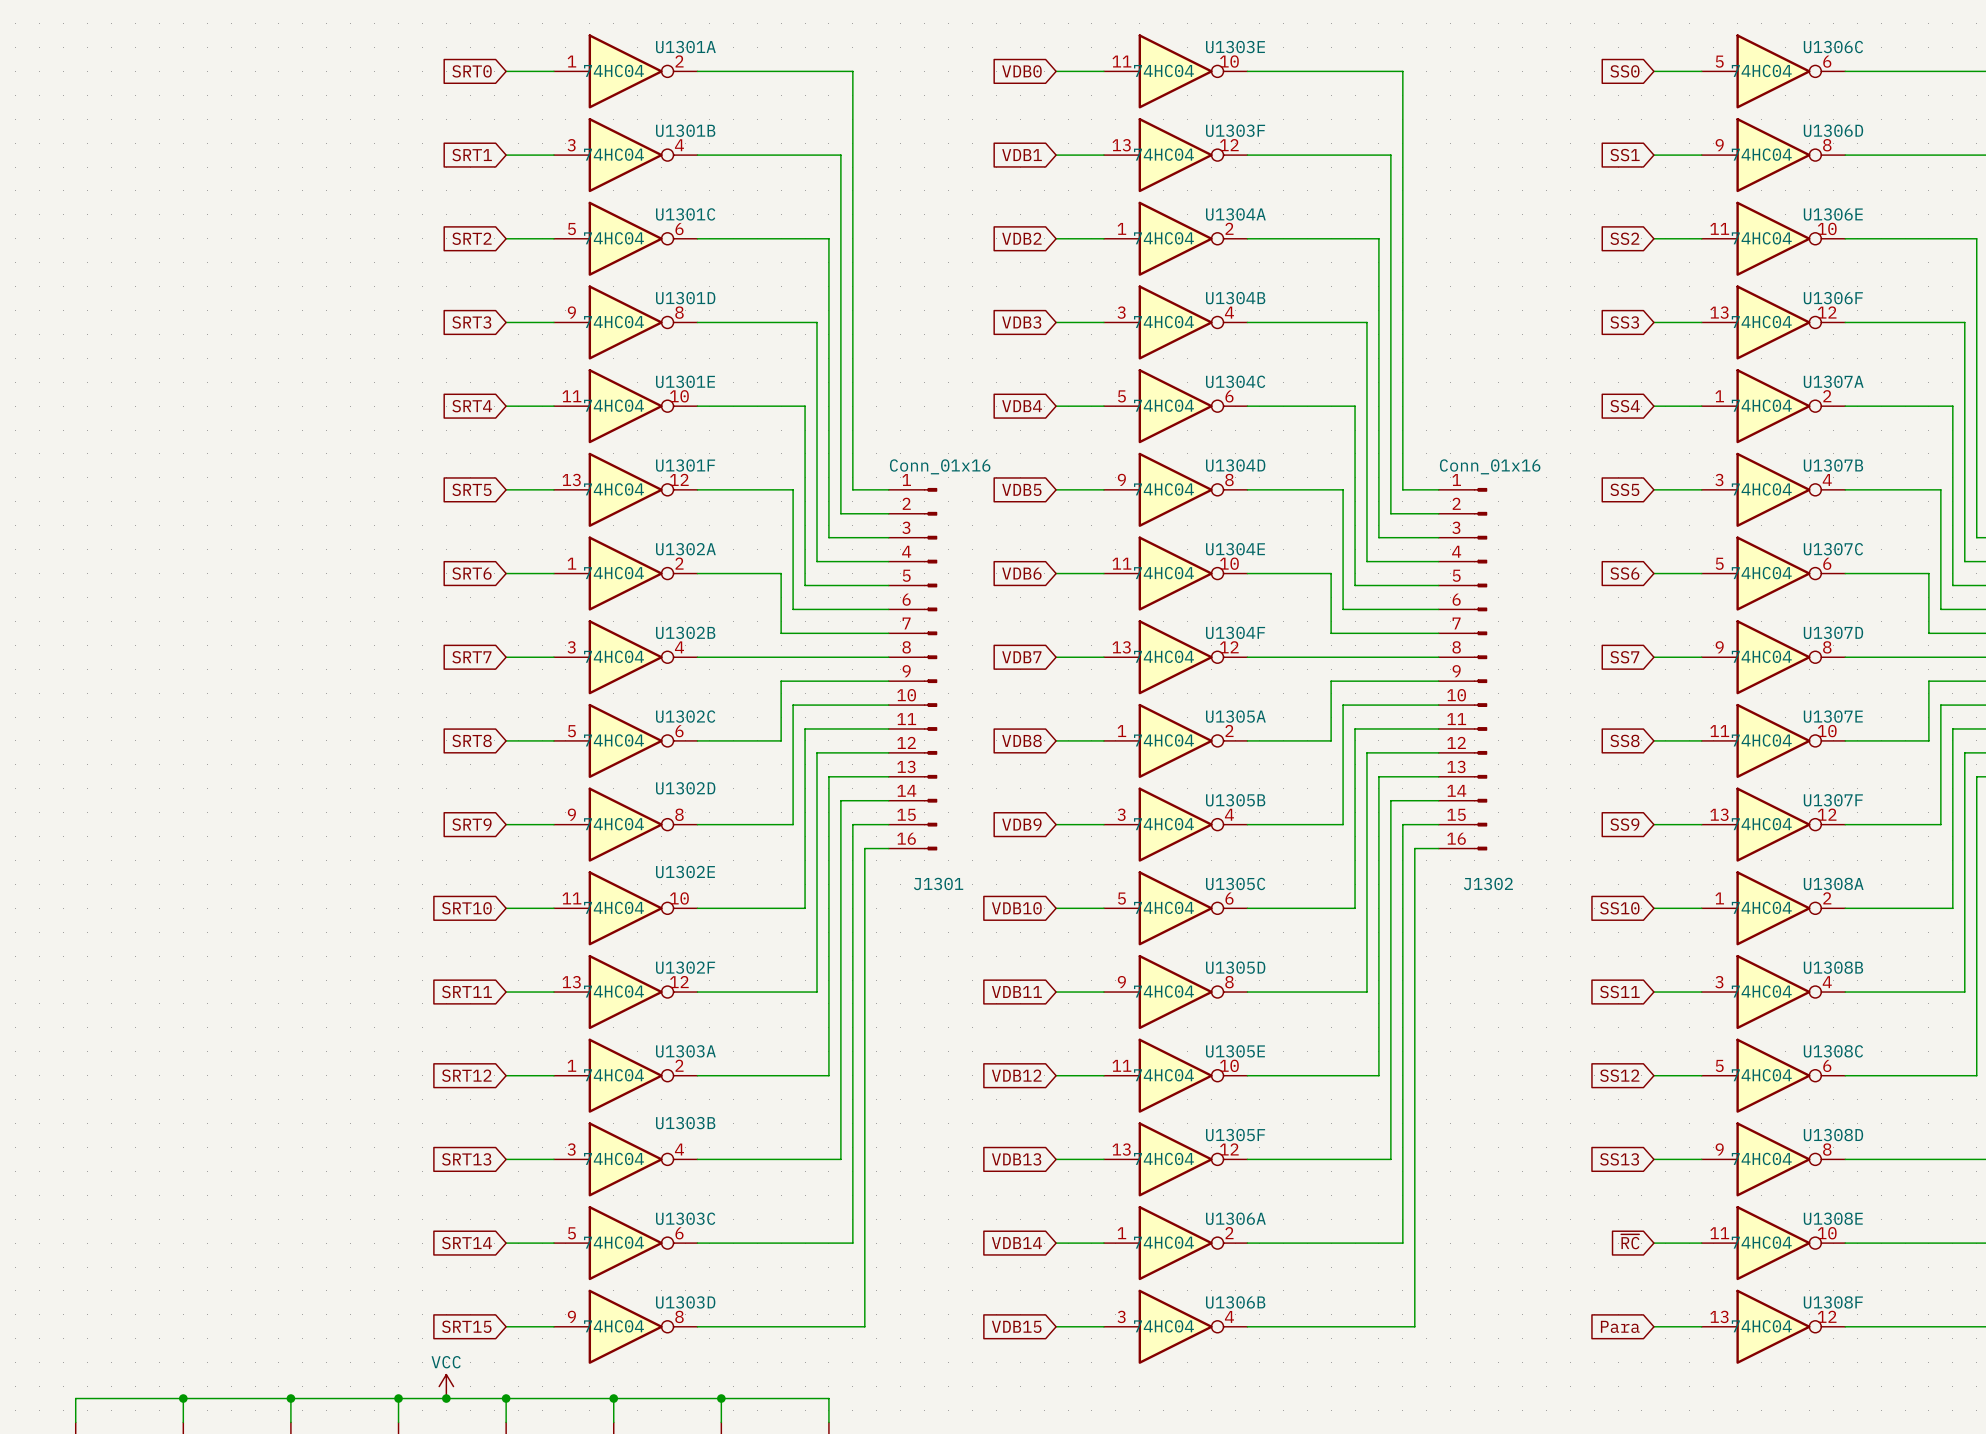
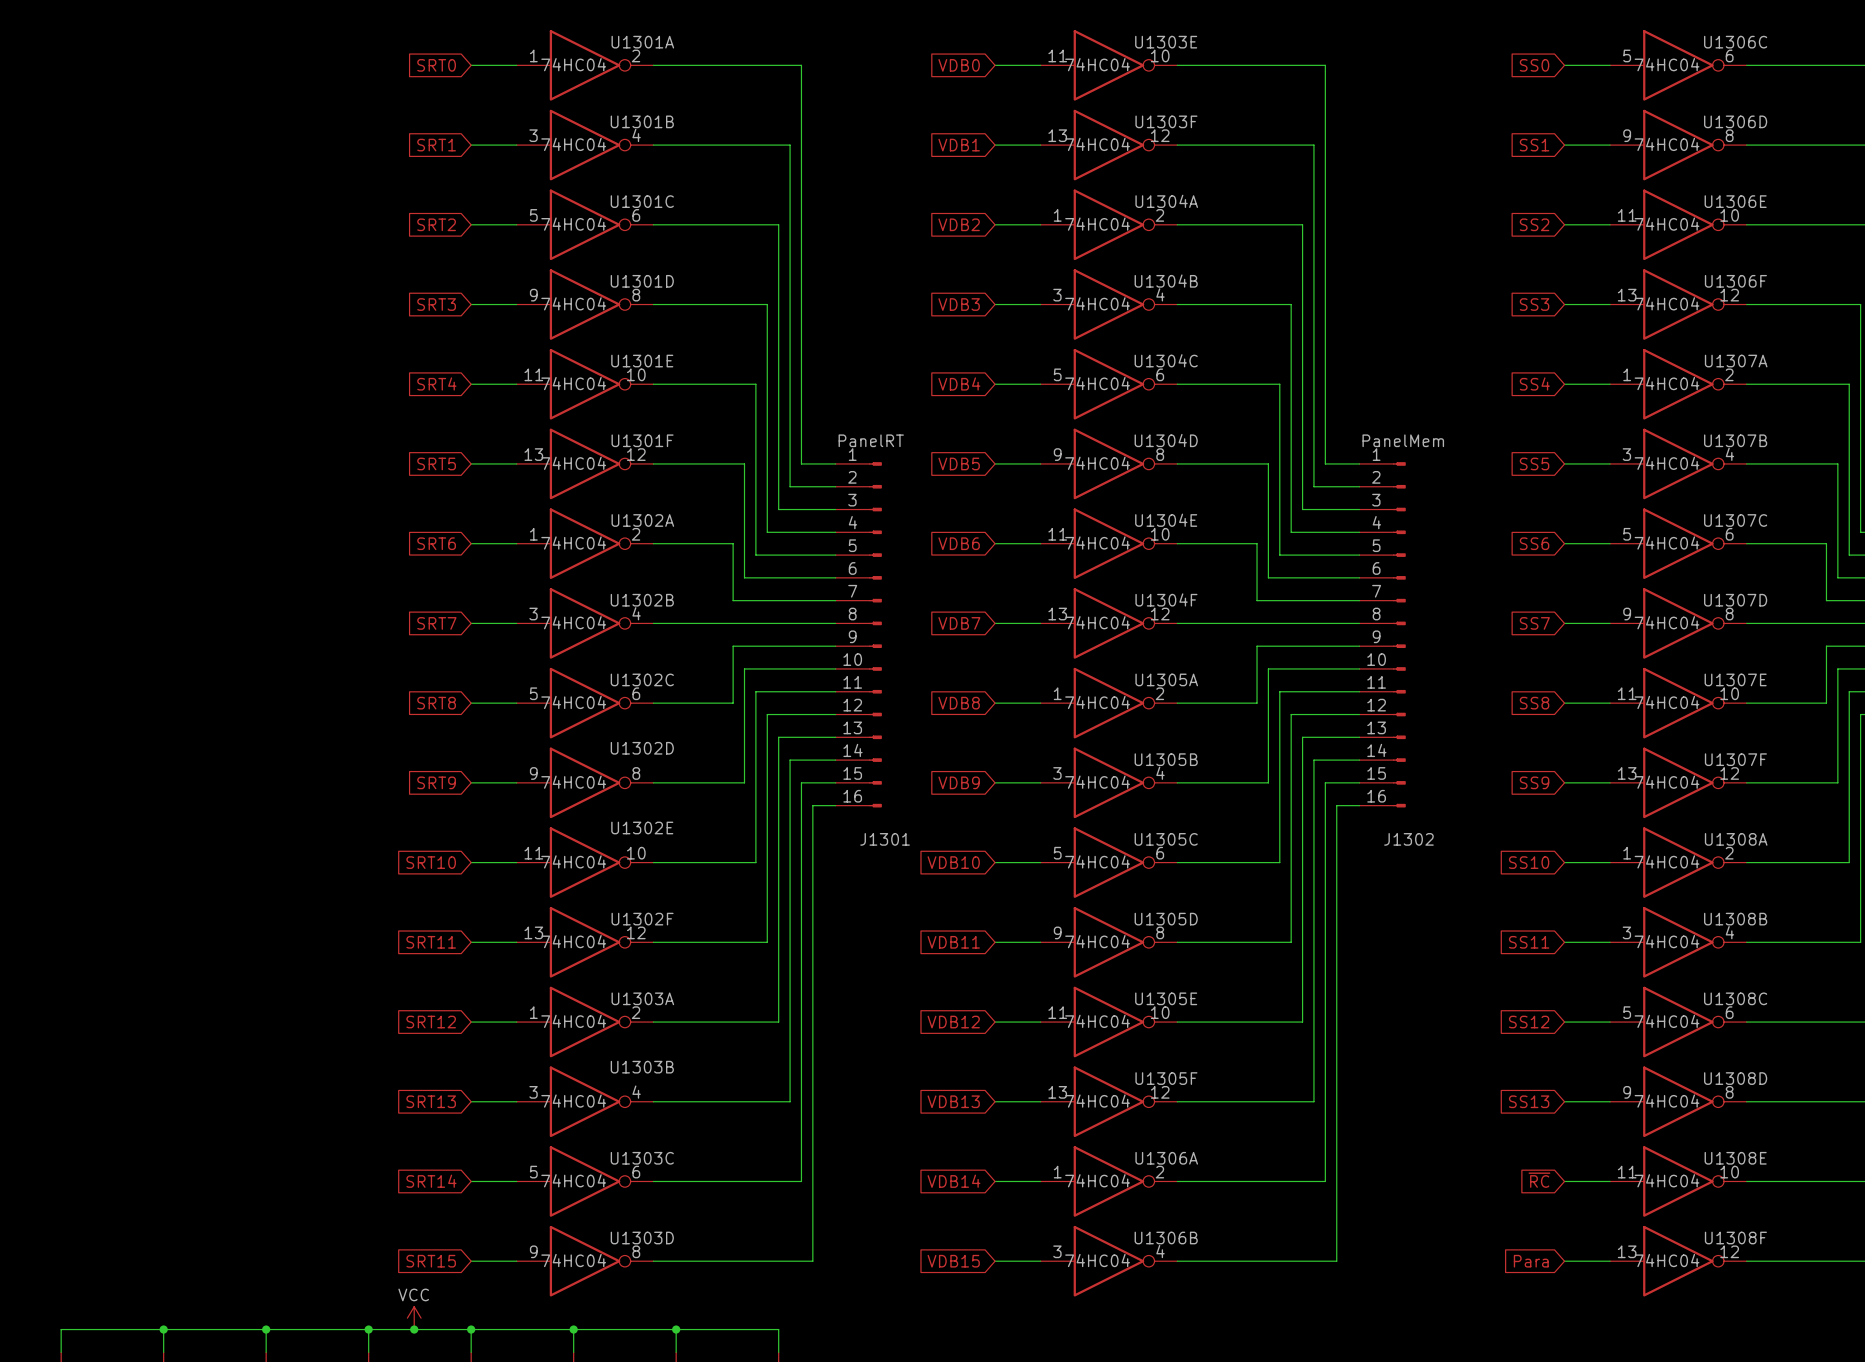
J1301 value: Conn_01x16 (940, 466) -> PanelRT (871, 440)
J1302 value: Conn_01x16 (1490, 466) -> PanelMem (1403, 440)

